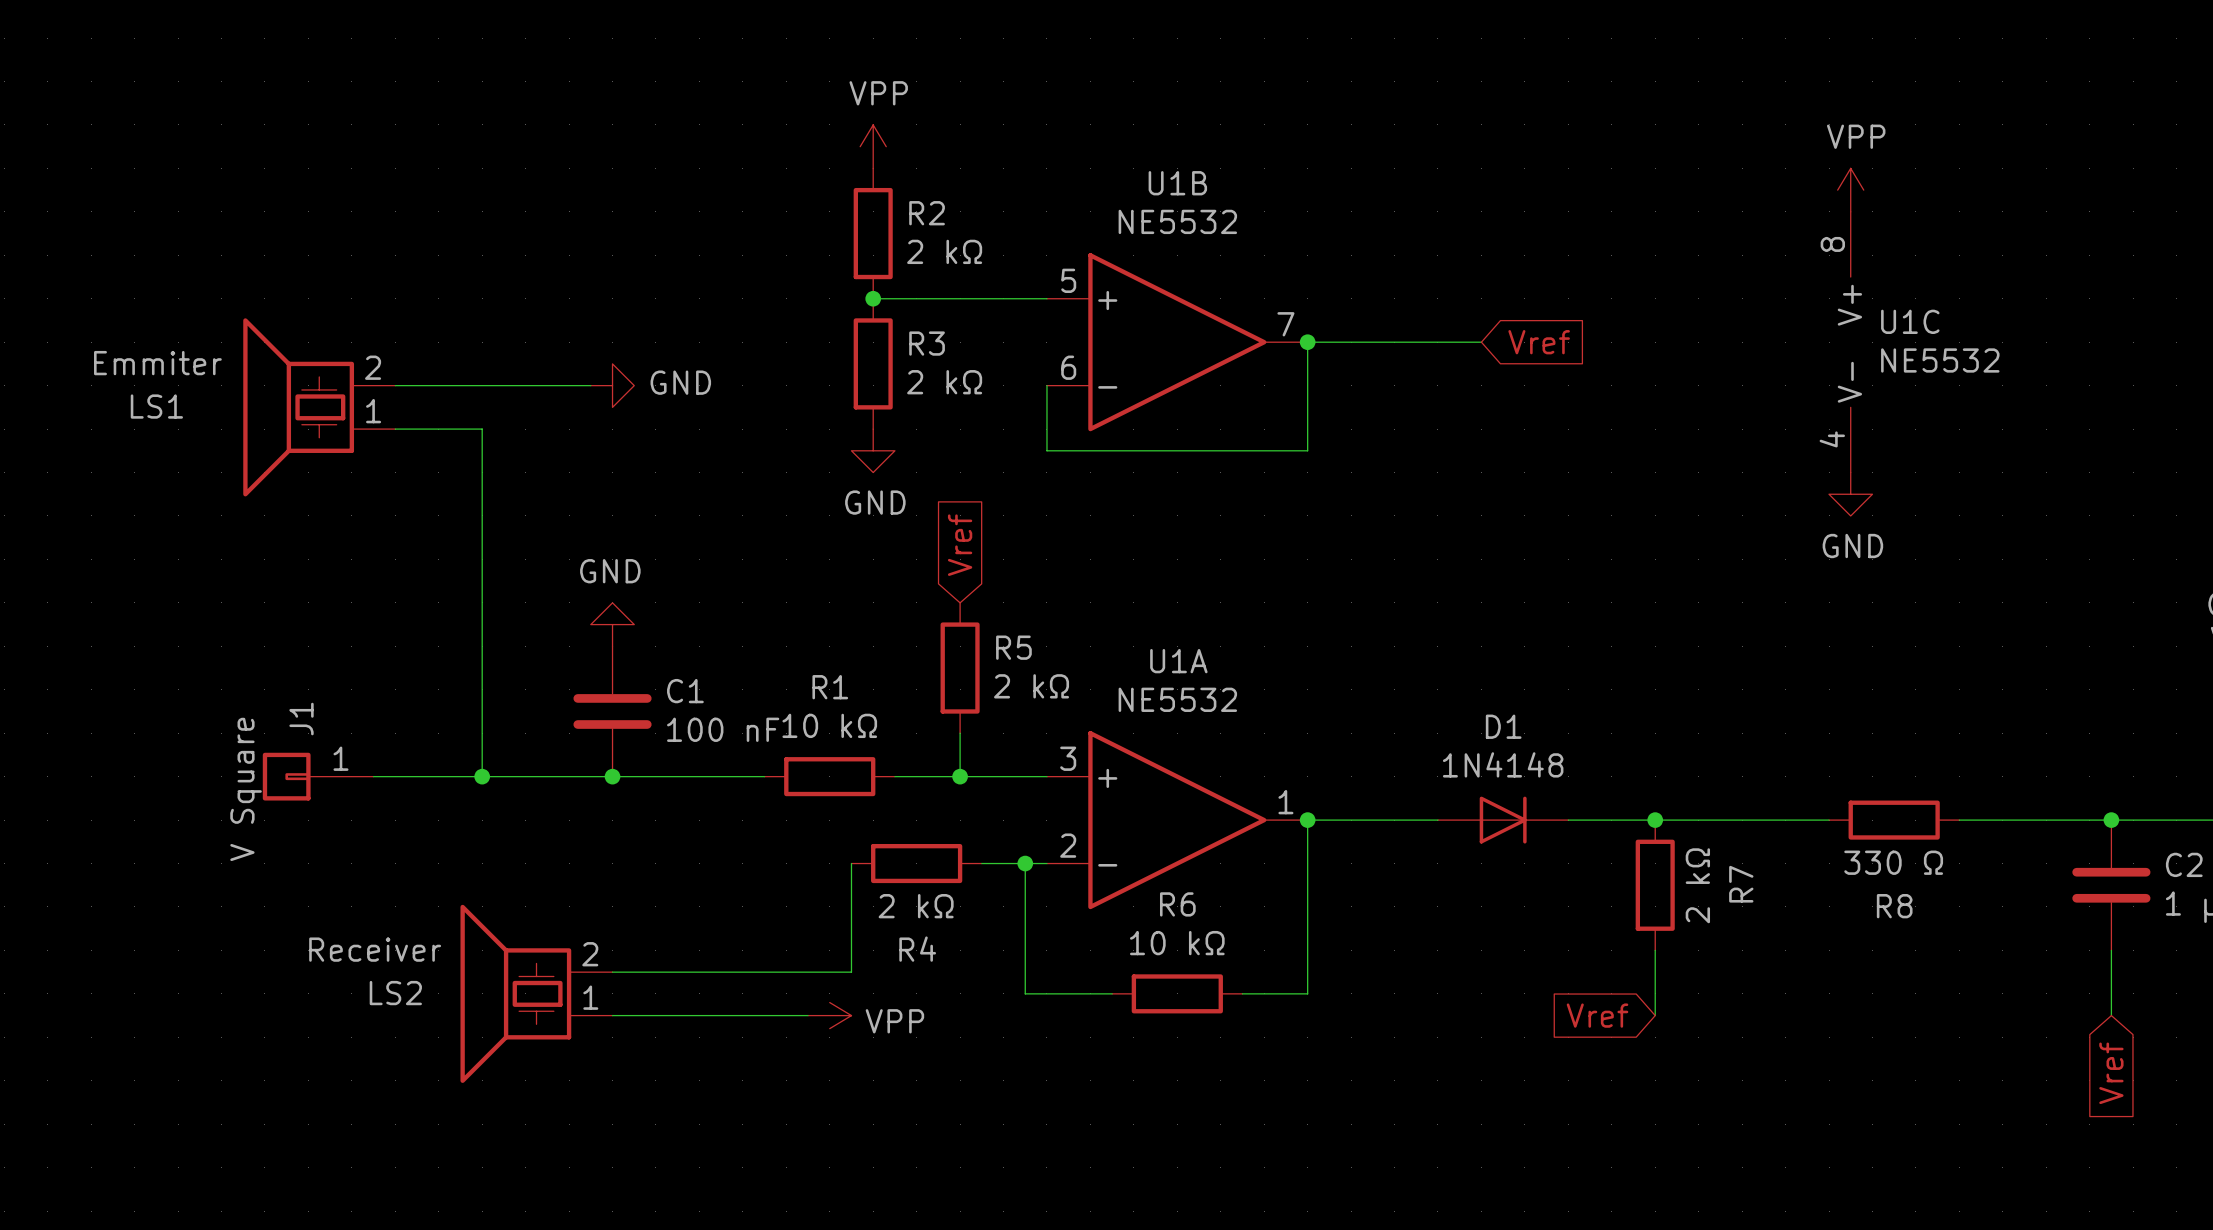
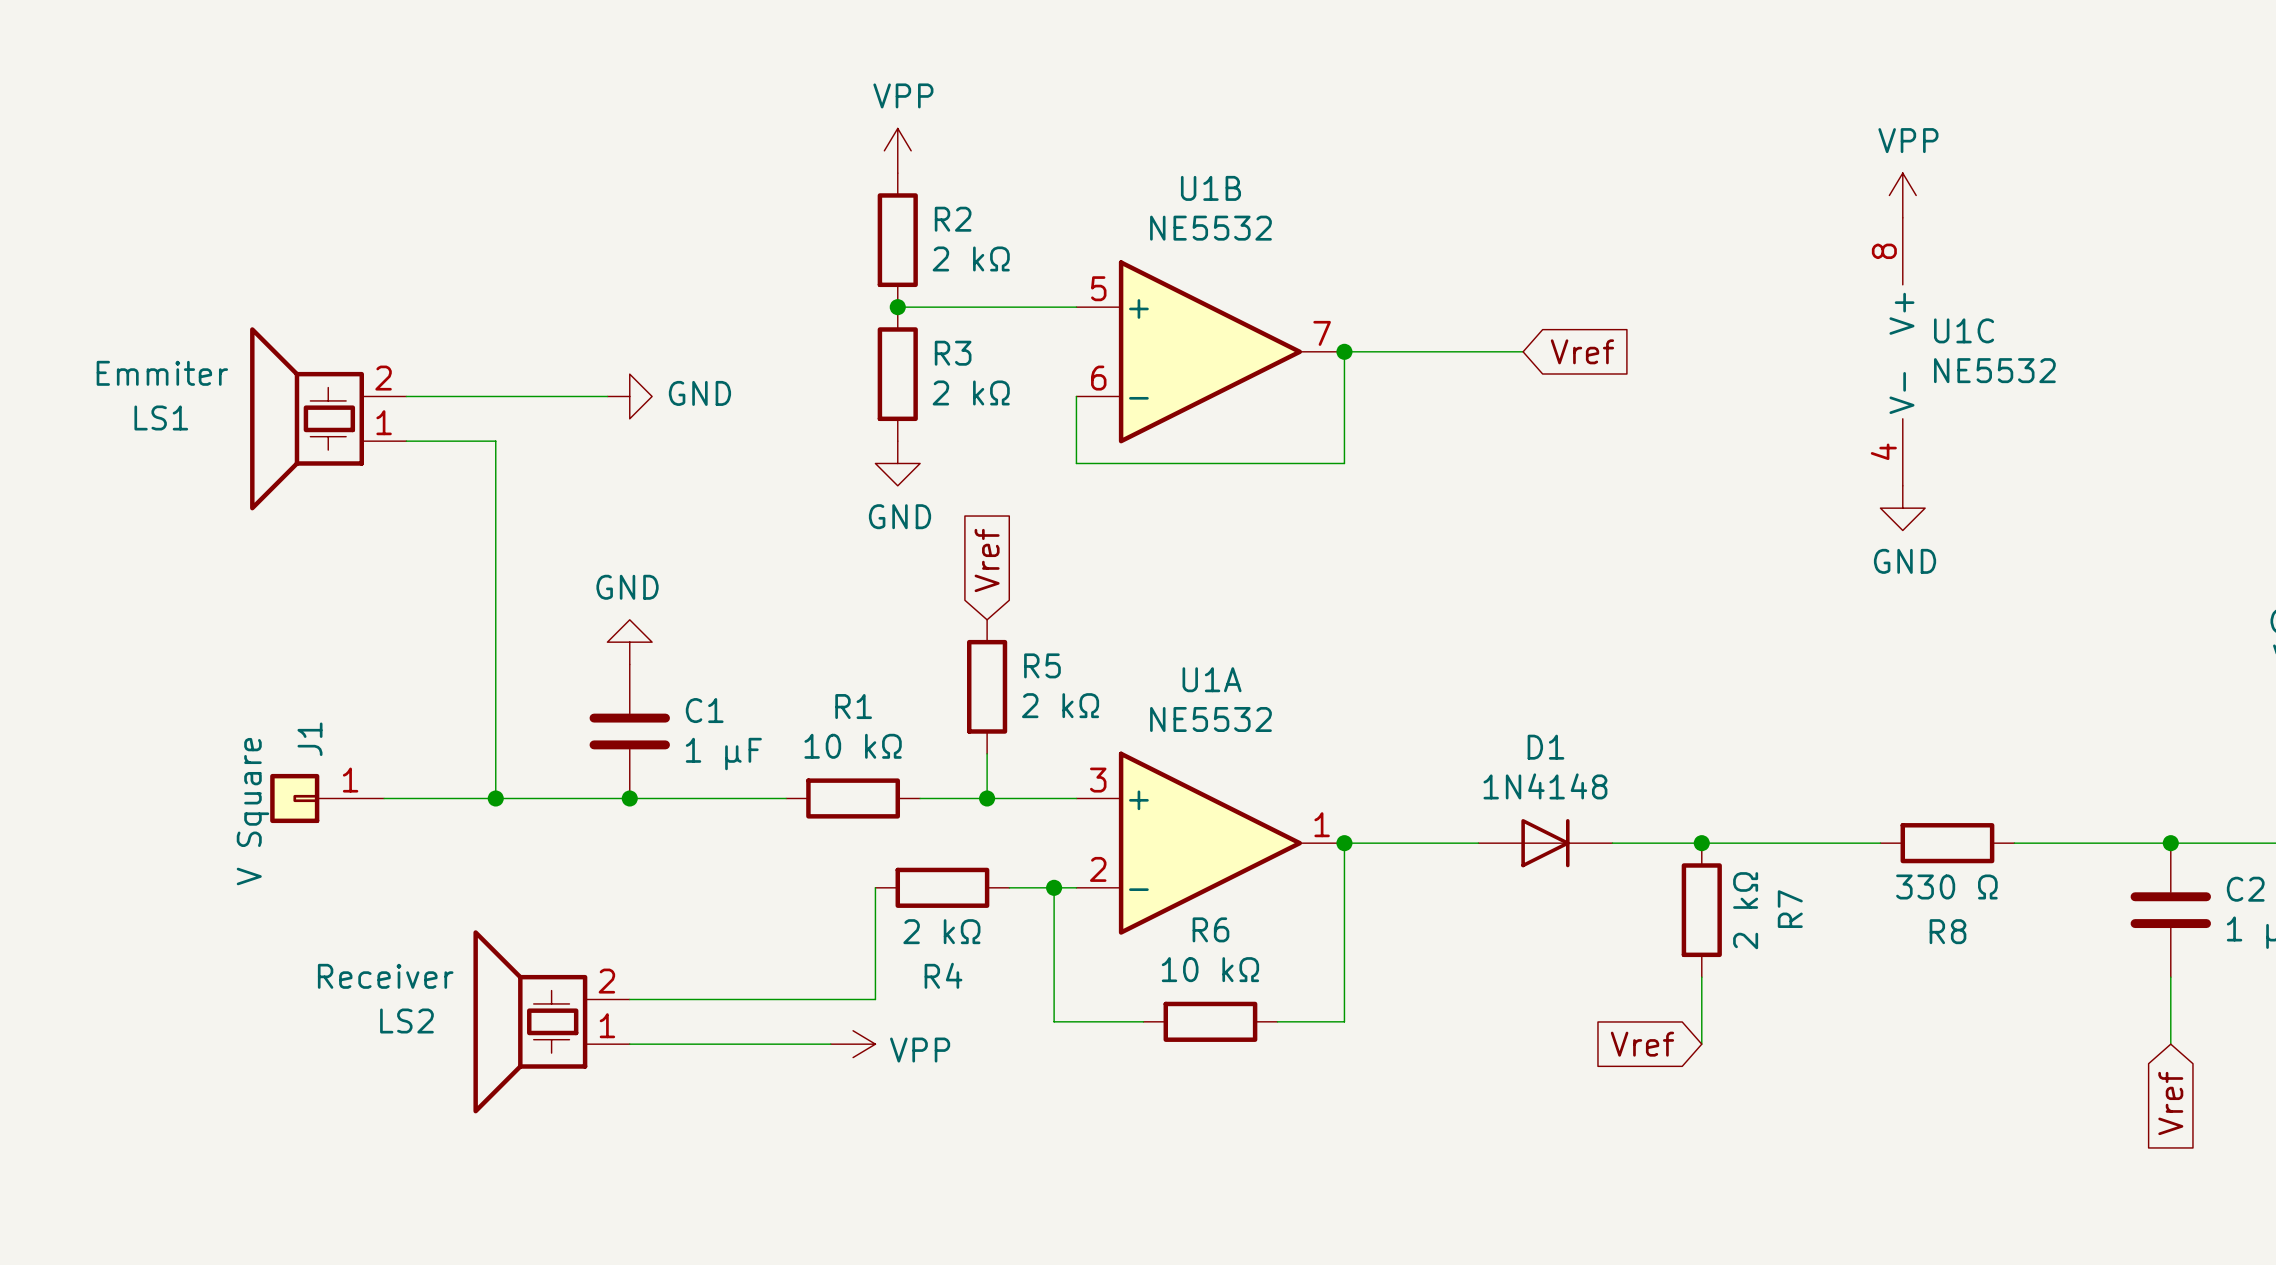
C1 value: 100 nF (723, 729) -> 1 μF (723, 754)

